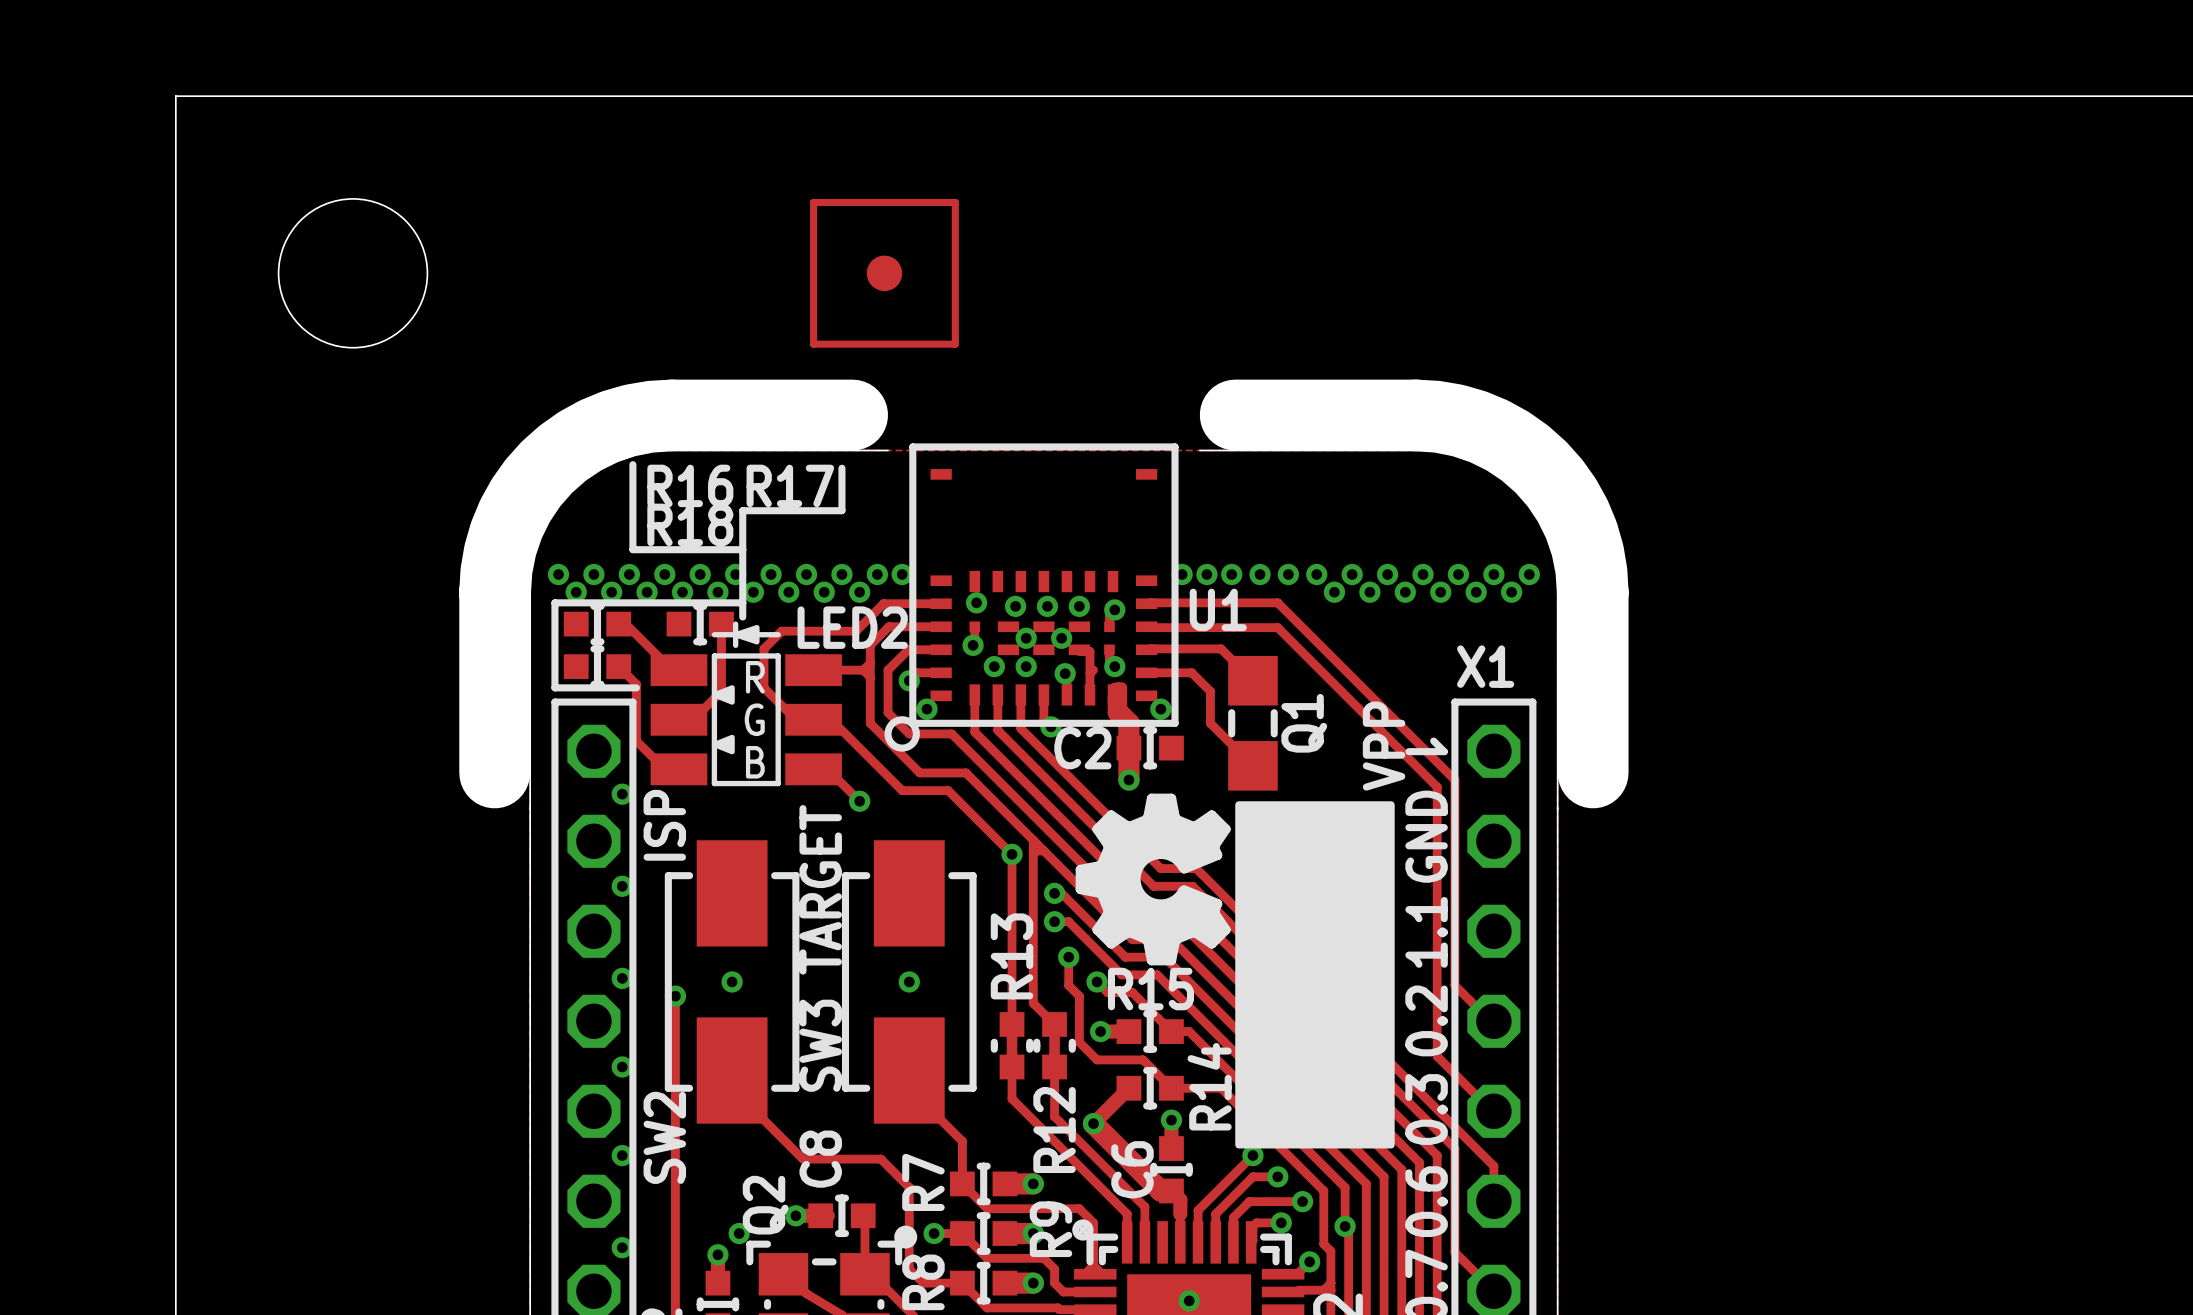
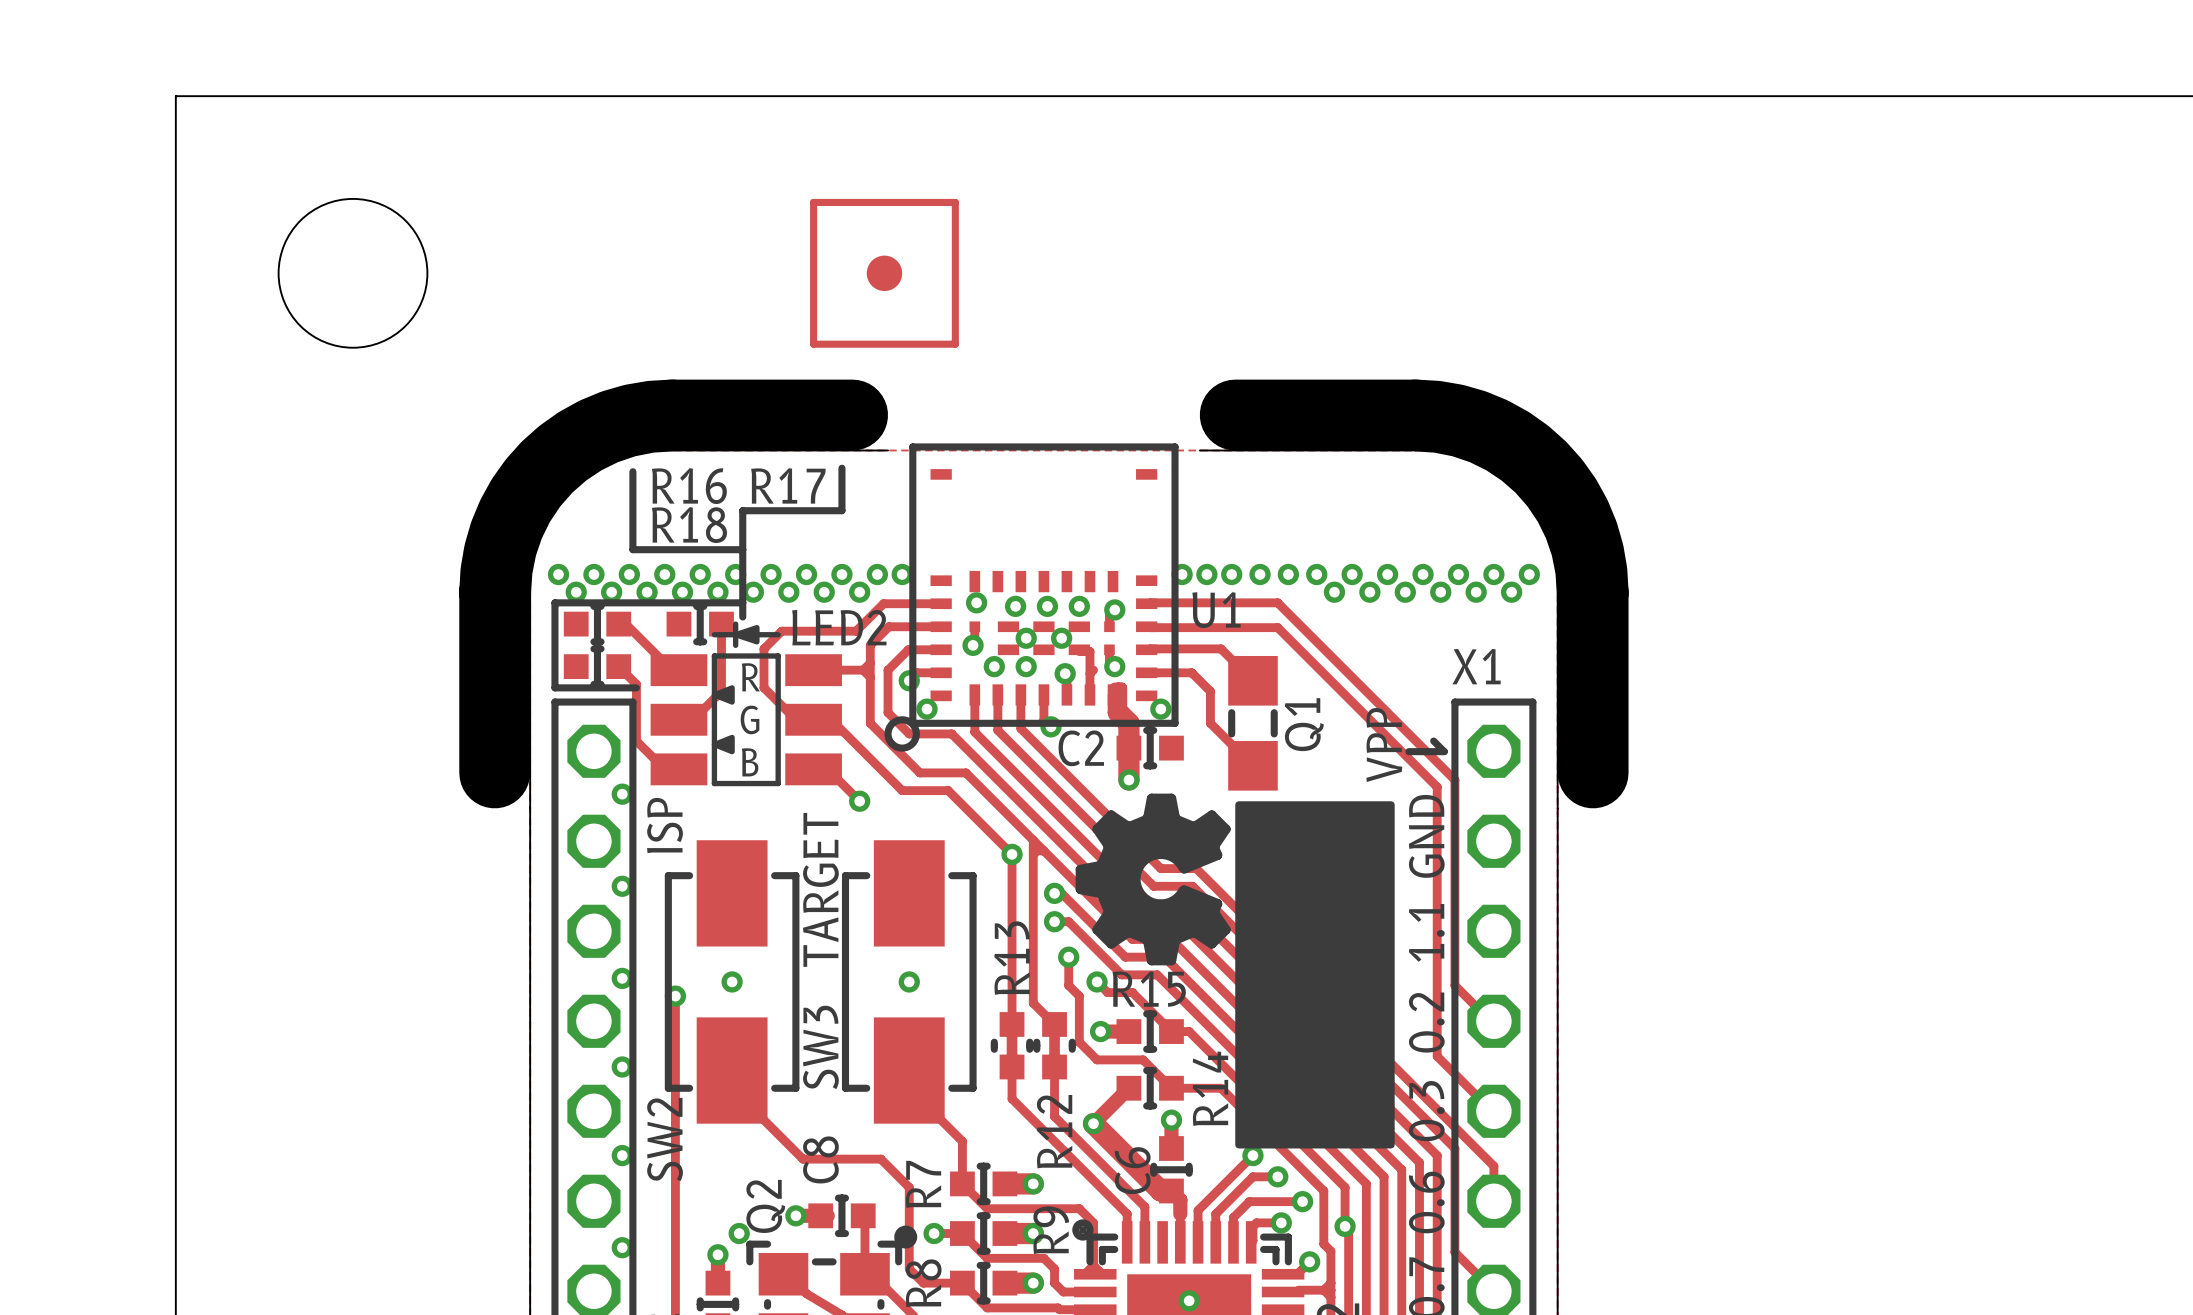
line: (632, 464) (632, 471) -> none

